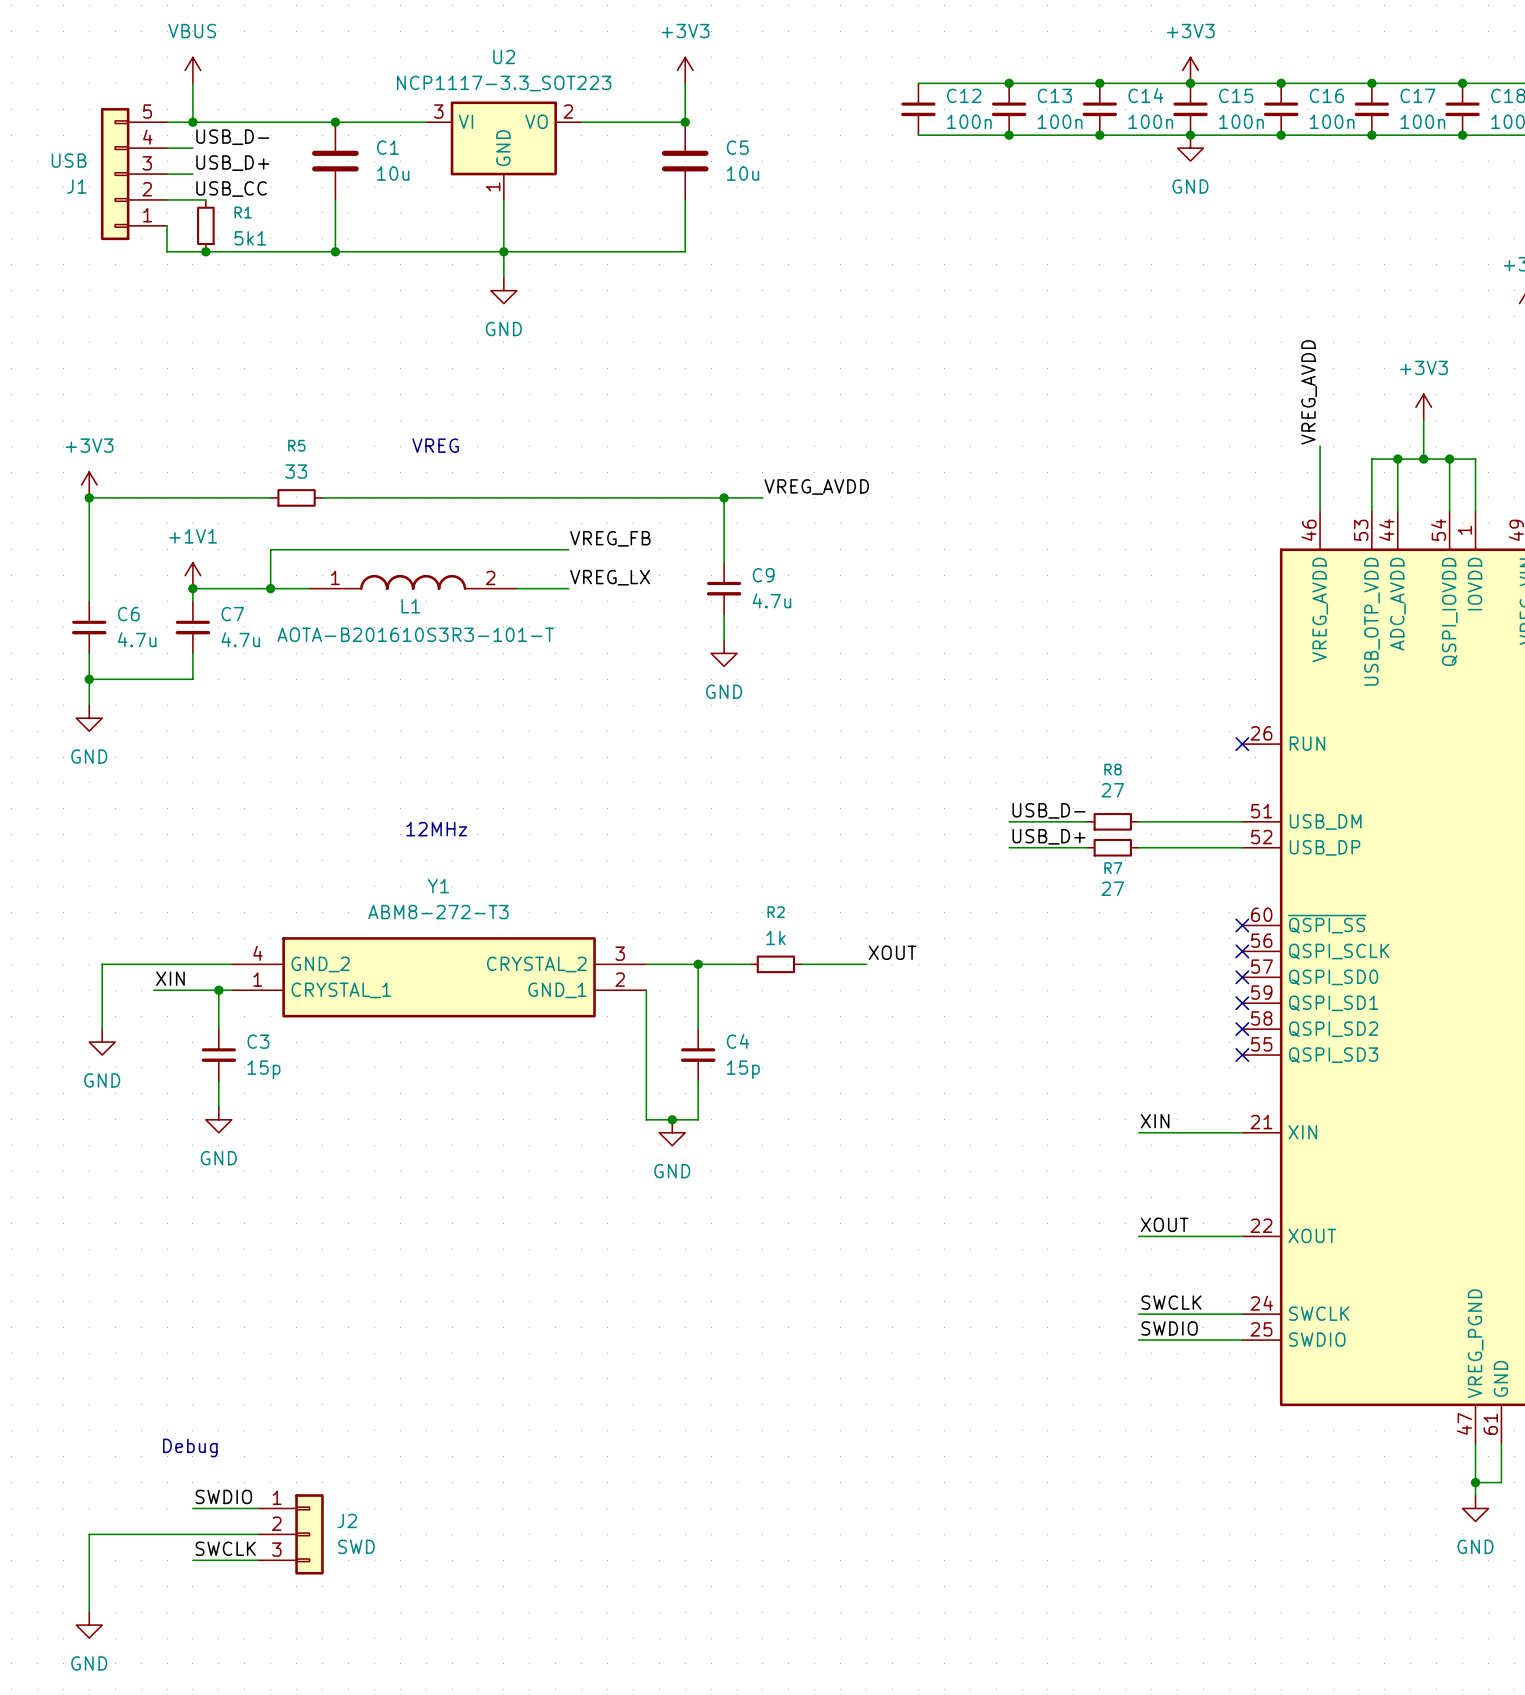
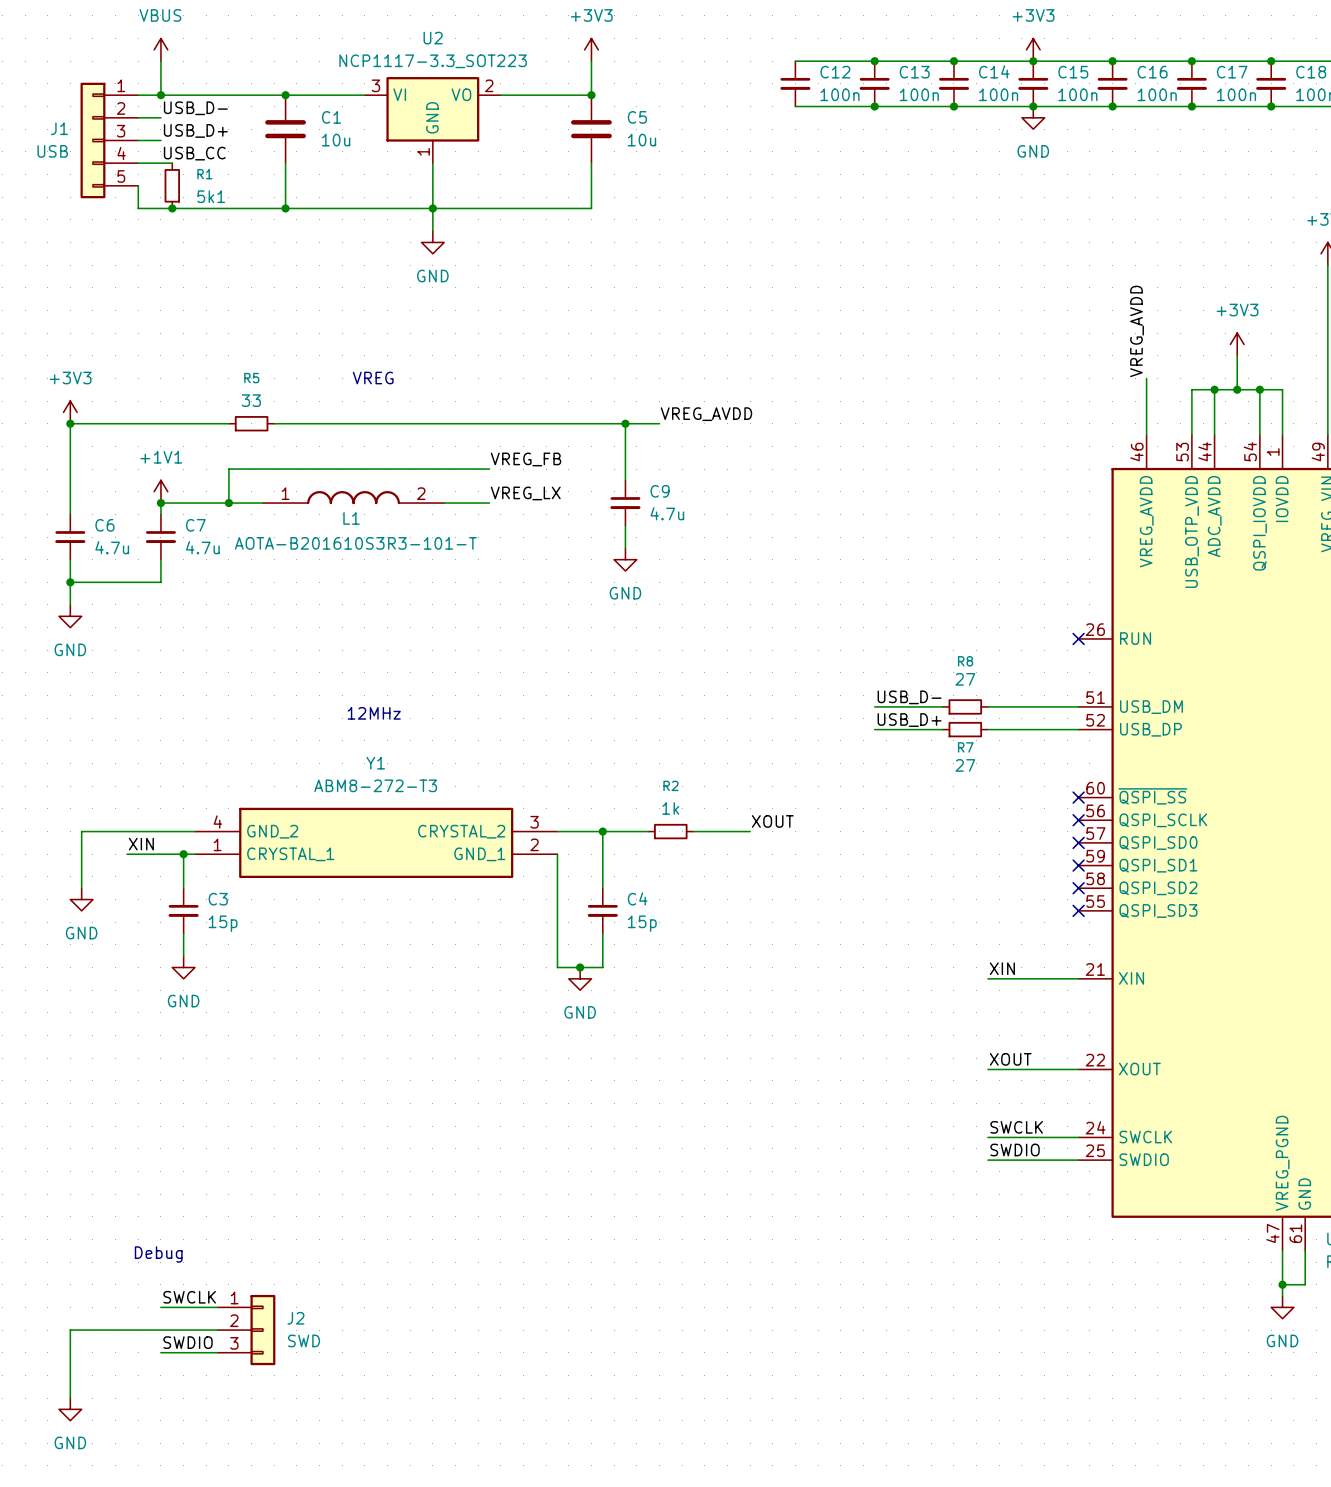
J1 flip: as is (115, 174) -> up-down (92, 140)
label: SWDIO (223, 1496) -> SWCLK (189, 1297)
label: SWCLK (225, 1548) -> SWDIO (188, 1342)

